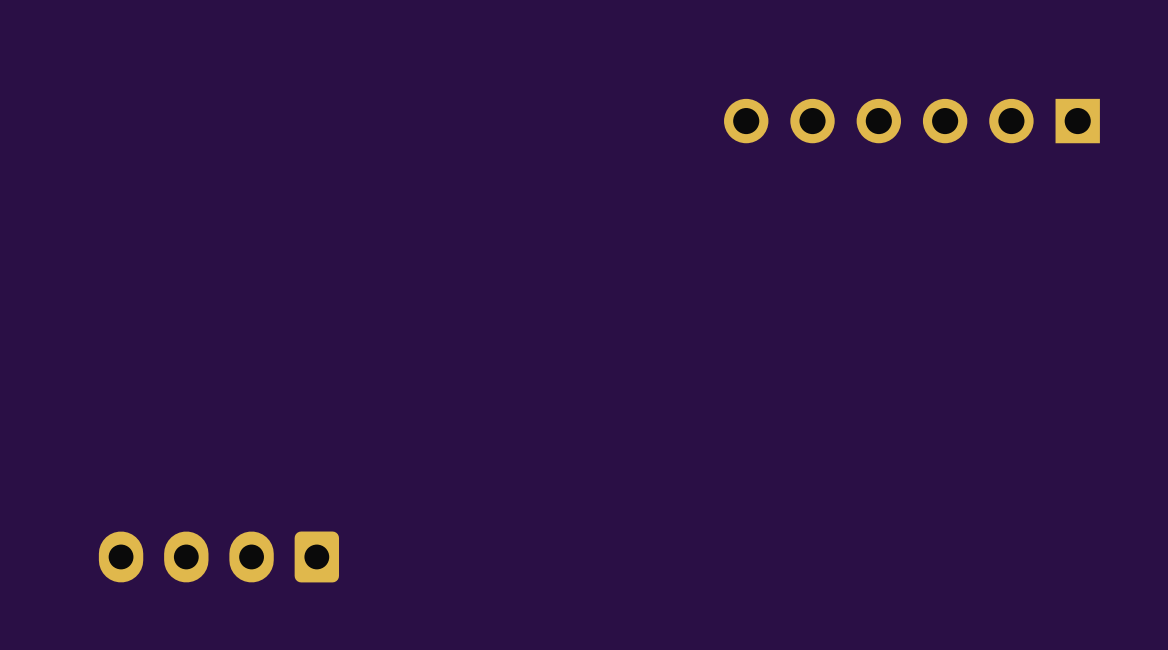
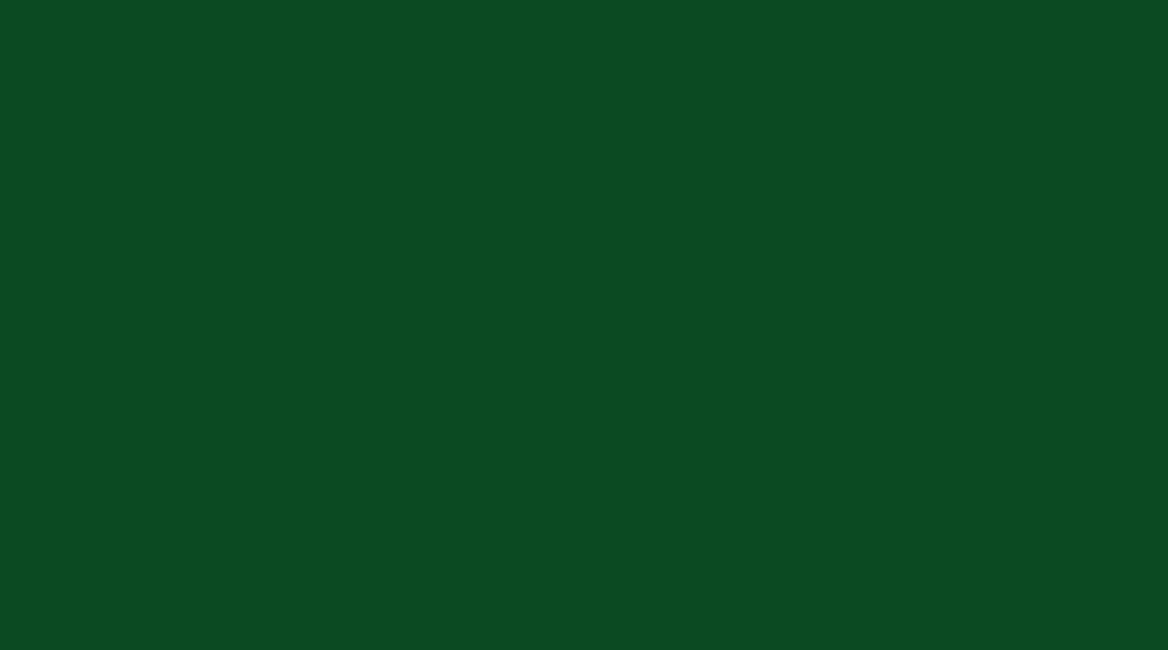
part: (911, 121) -> none
part: (218, 556) -> none

